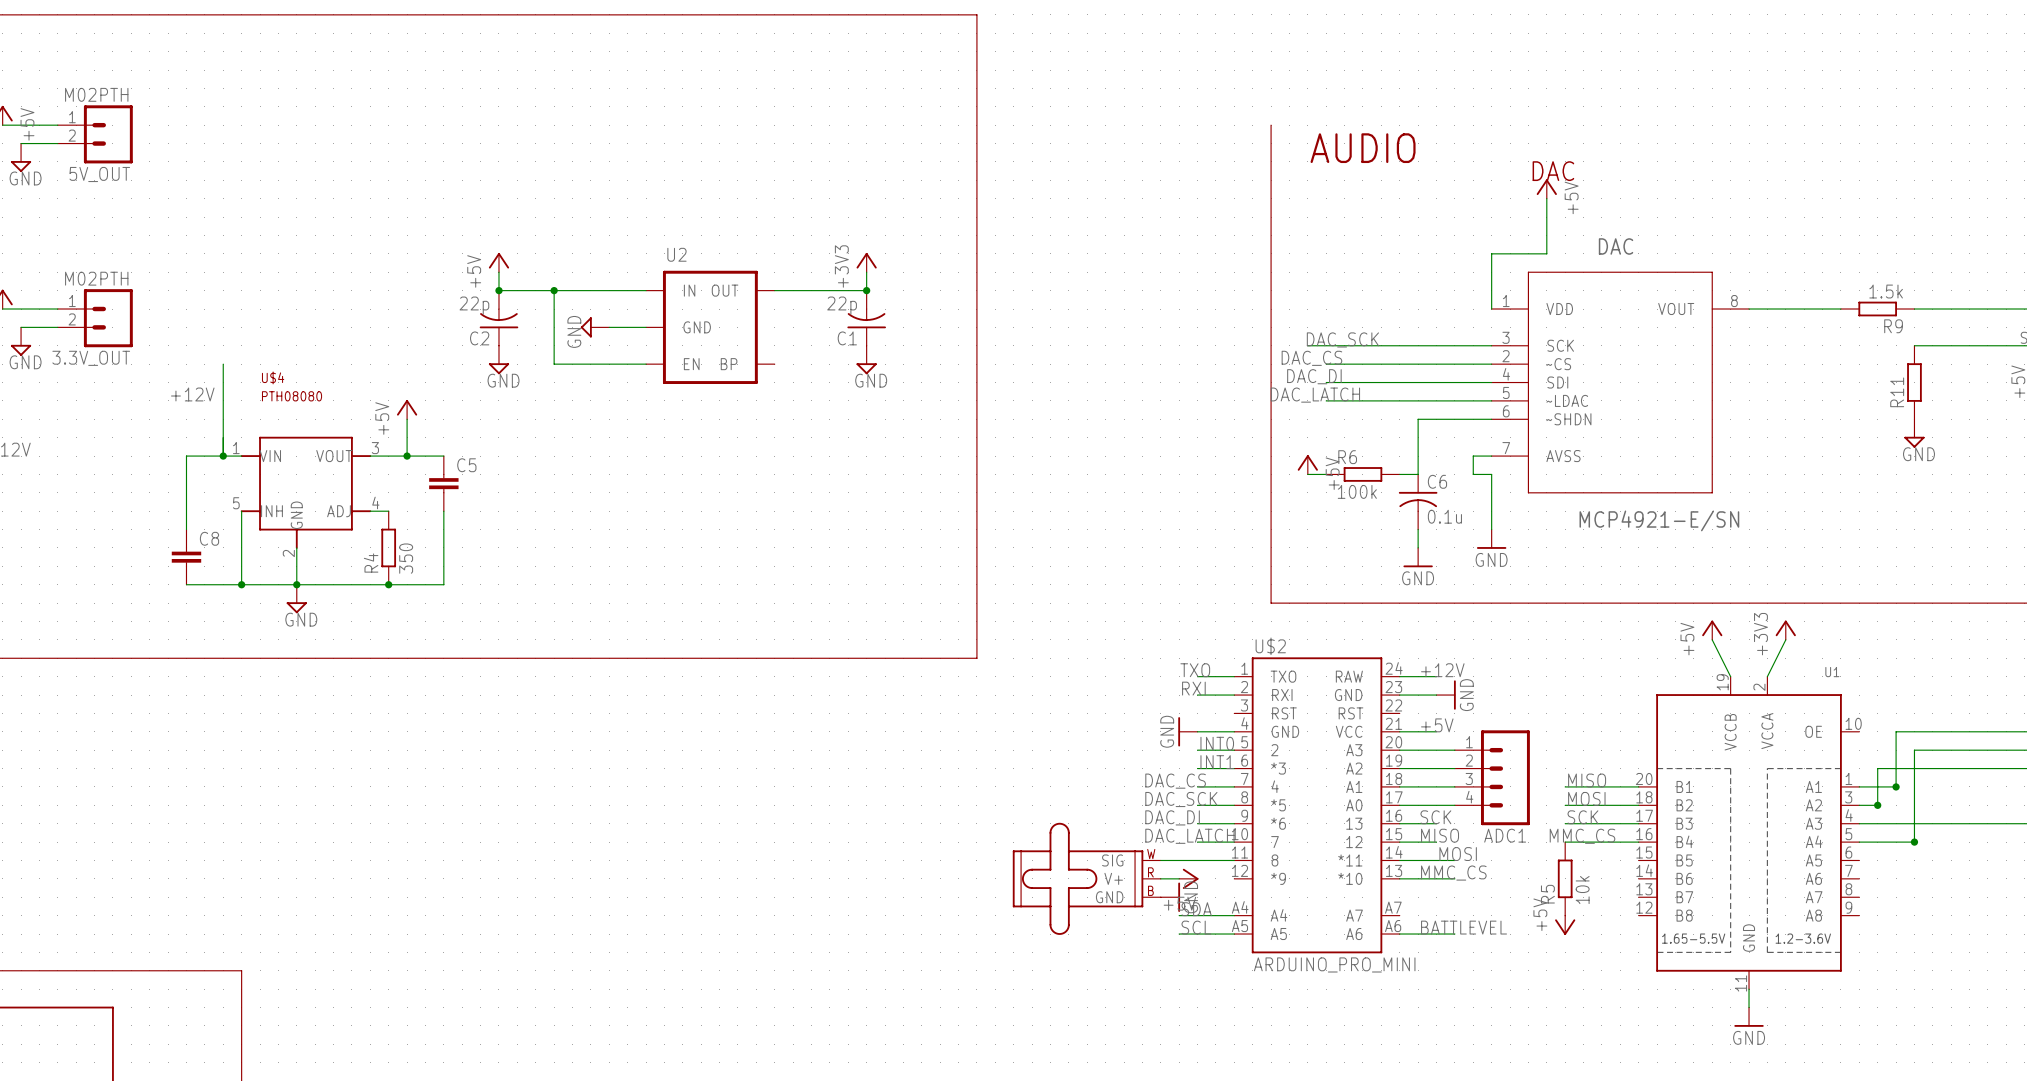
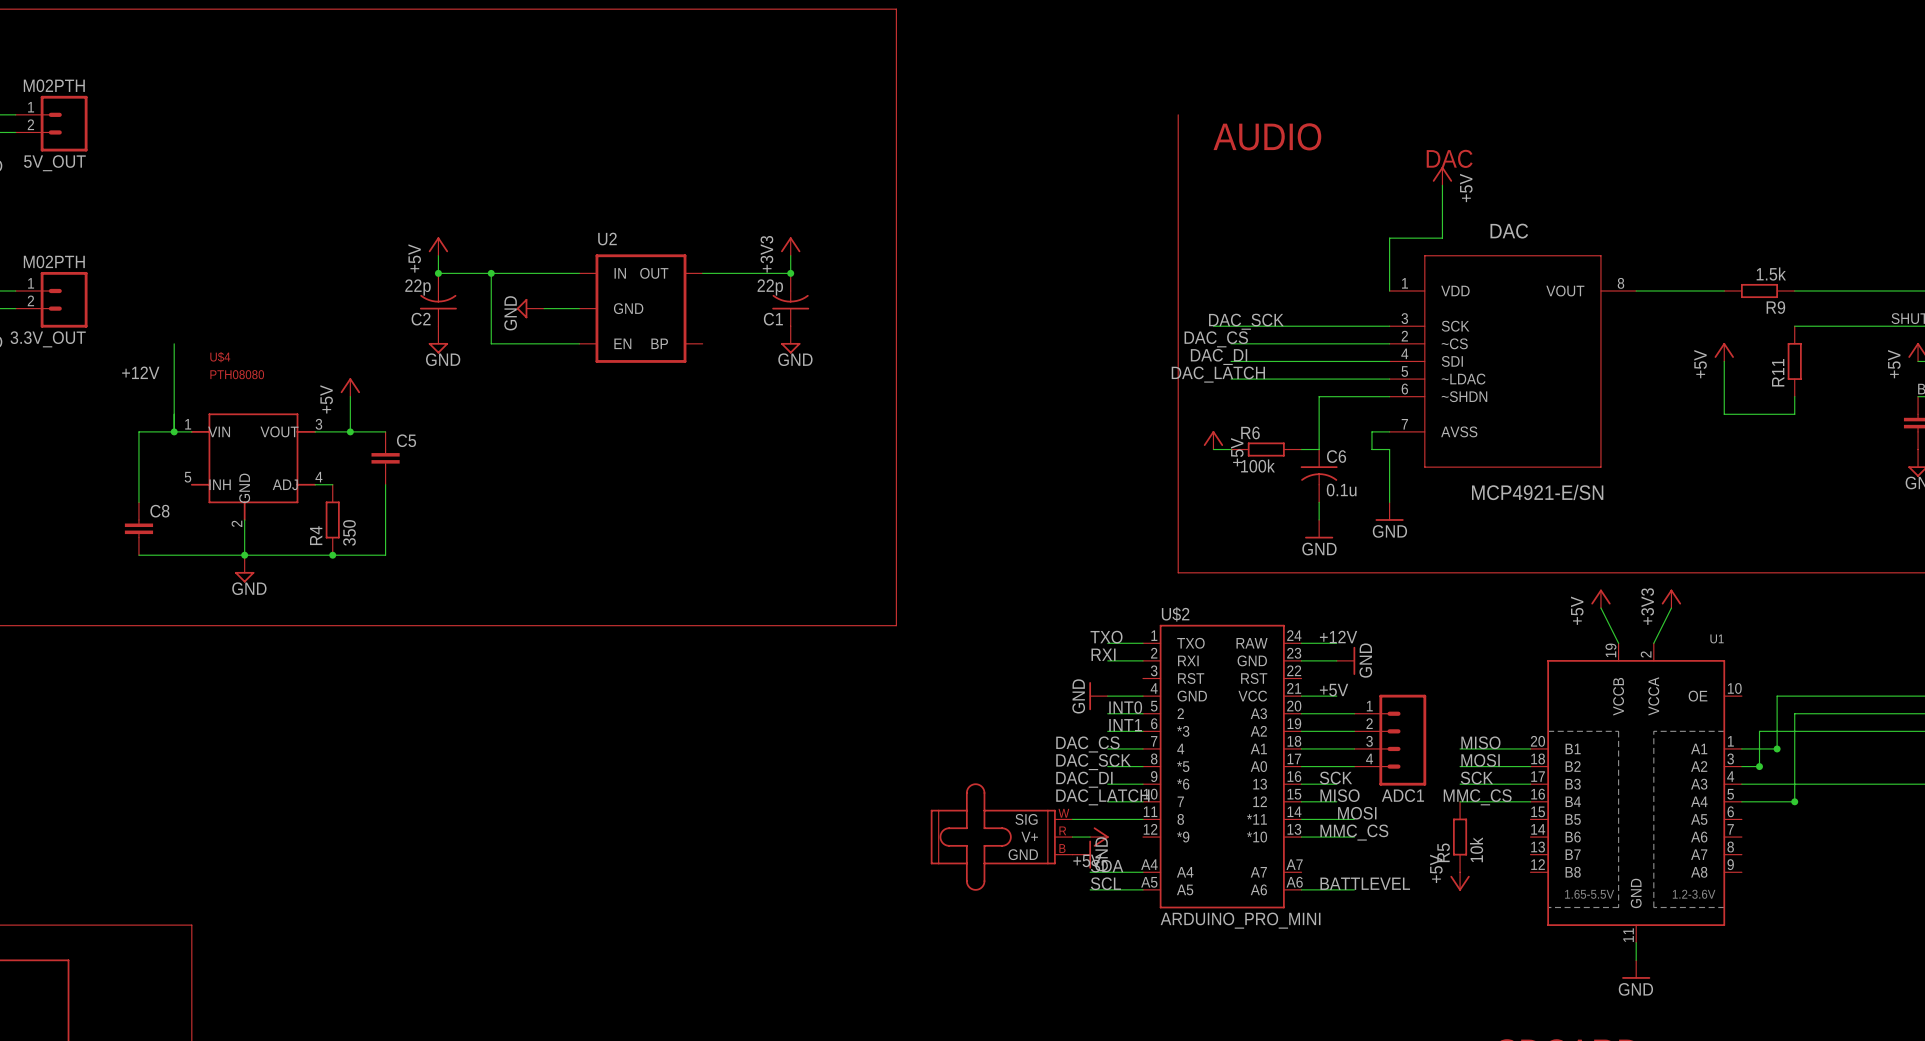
power symbol: none -> +5V (1724, 352)
wire: none -> (1724, 361) (1724, 414) (1794, 414) (1794, 396)
power symbol: GND (1914, 433) -> none
wire: (241, 511) (241, 584) -> none
junction: (241, 584) -> none

